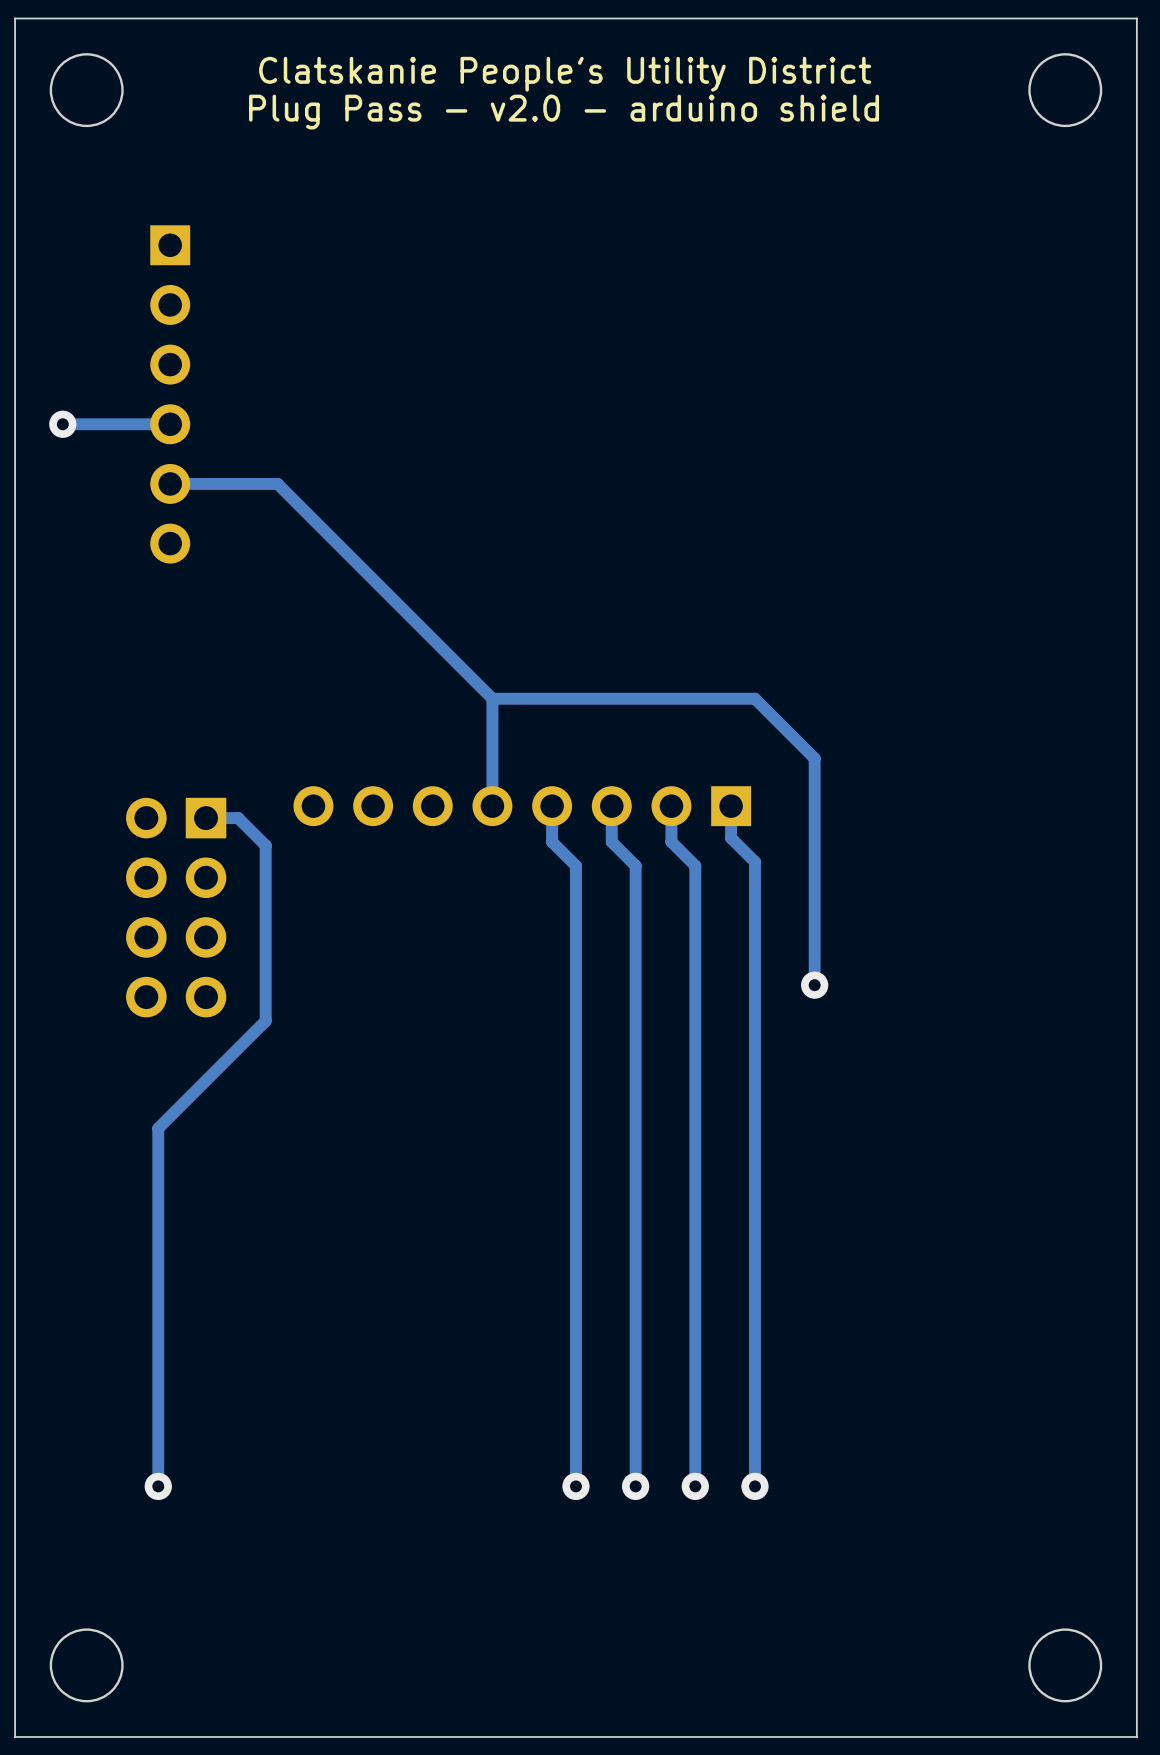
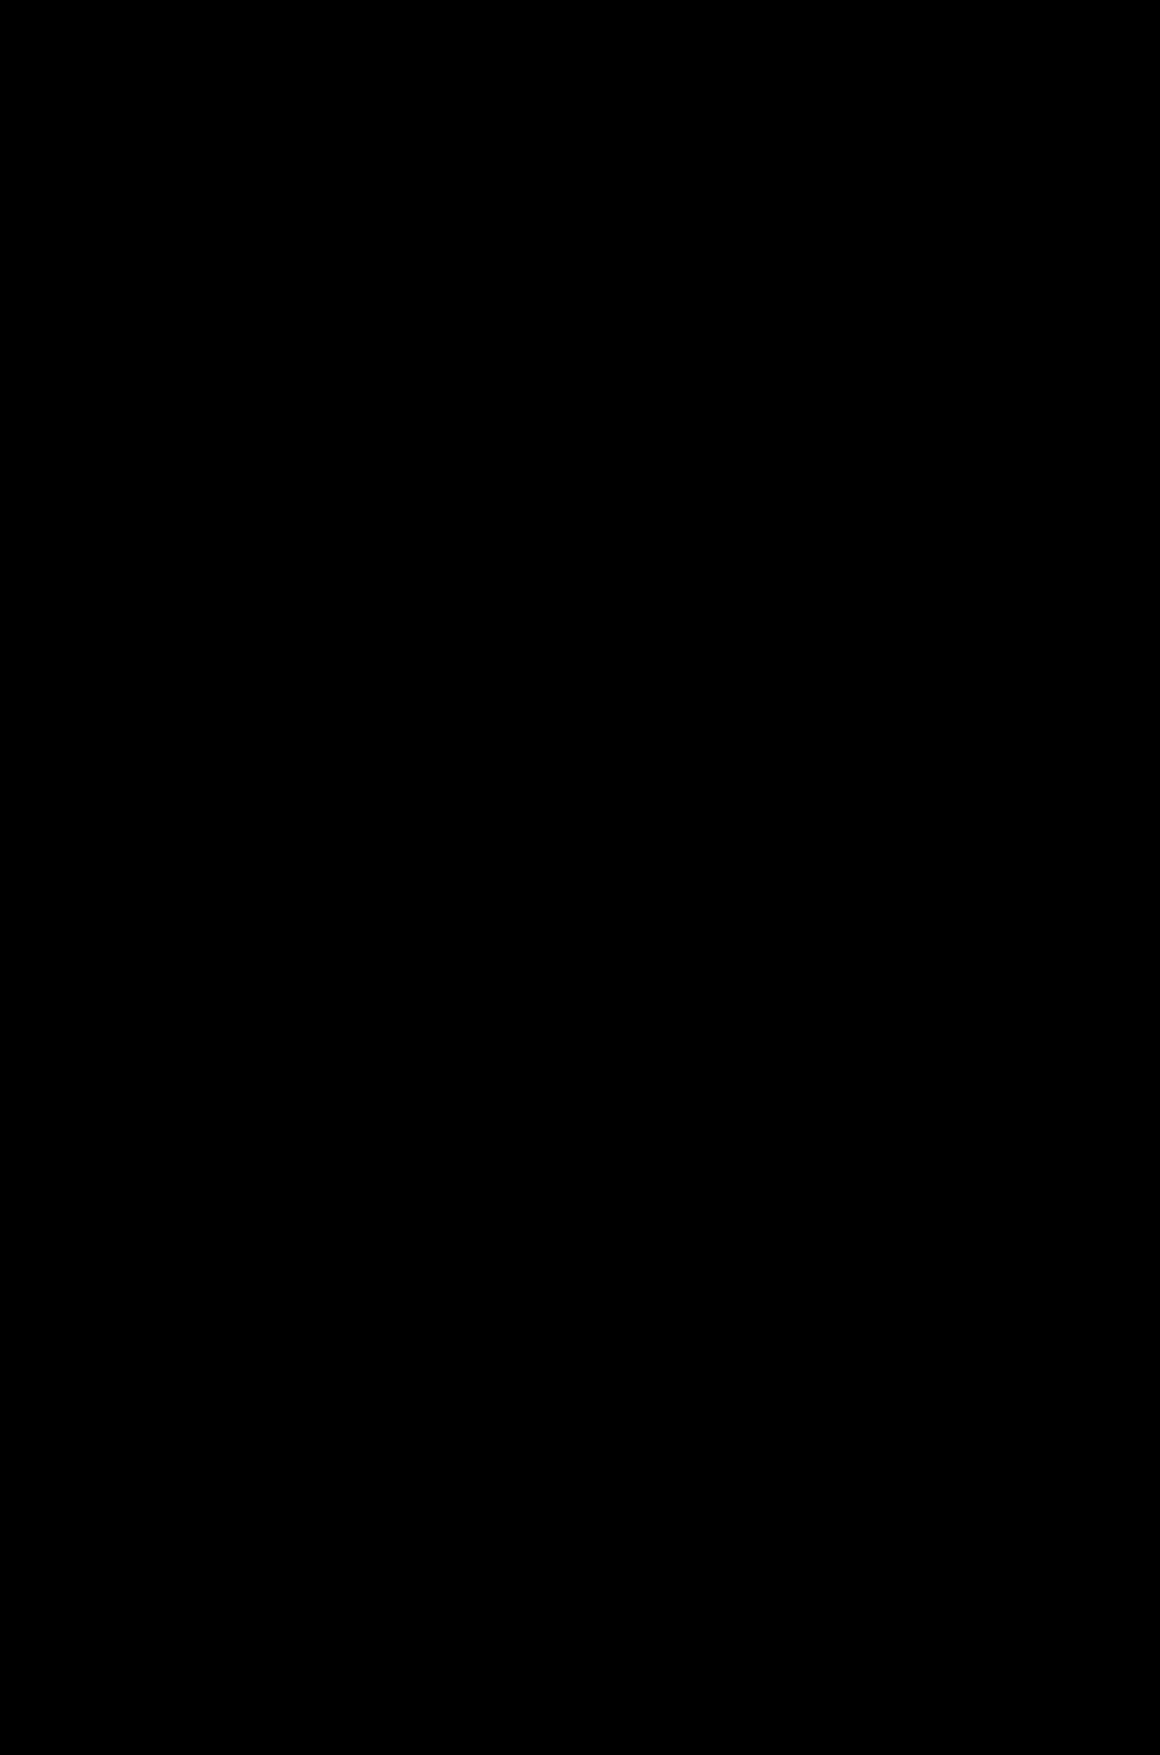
board edge: (1136, 18) (15, 18) (15, 1737) (1136, 1737) (1136, 18) -> none
round board edge: [49, 53, 124, 128] -> none
round board edge: [1028, 53, 1103, 128] -> none
text: Clatskanie People's Utility District (565, 74) -> none
text: Plug Pass - v2.0 - arduino shield (564, 112) -> none
part: (170, 394) -> none
via: (62, 424) -> none
track: (170, 424) (62, 424) -> none
track: (170, 483) (277, 483) (492, 698) -> none
track: (492, 698) (492, 806) -> none
track: (492, 698) (754, 698) (814, 758) (814, 985) -> none
part: (522, 806) -> none
track: (552, 806) (552, 841) (575, 865) (575, 1486) -> none
track: (611, 806) (611, 841) (635, 865) (635, 1486) -> none
track: (671, 806) (671, 841) (695, 865) (695, 1486) -> none
track: (731, 806) (731, 838) (754, 861) (754, 1486) -> none
track: (206, 818) (238, 818) (265, 845) (265, 1020) (158, 1128) (158, 1486) -> none
part: (176, 907) -> none
via: (814, 985) -> none
via: (158, 1486) -> none
via: (575, 1486) -> none
via: (635, 1486) -> none
via: (695, 1486) -> none
via: (754, 1486) -> none
round board edge: [49, 1628, 124, 1703] -> none
round board edge: [1028, 1628, 1103, 1703] -> none

